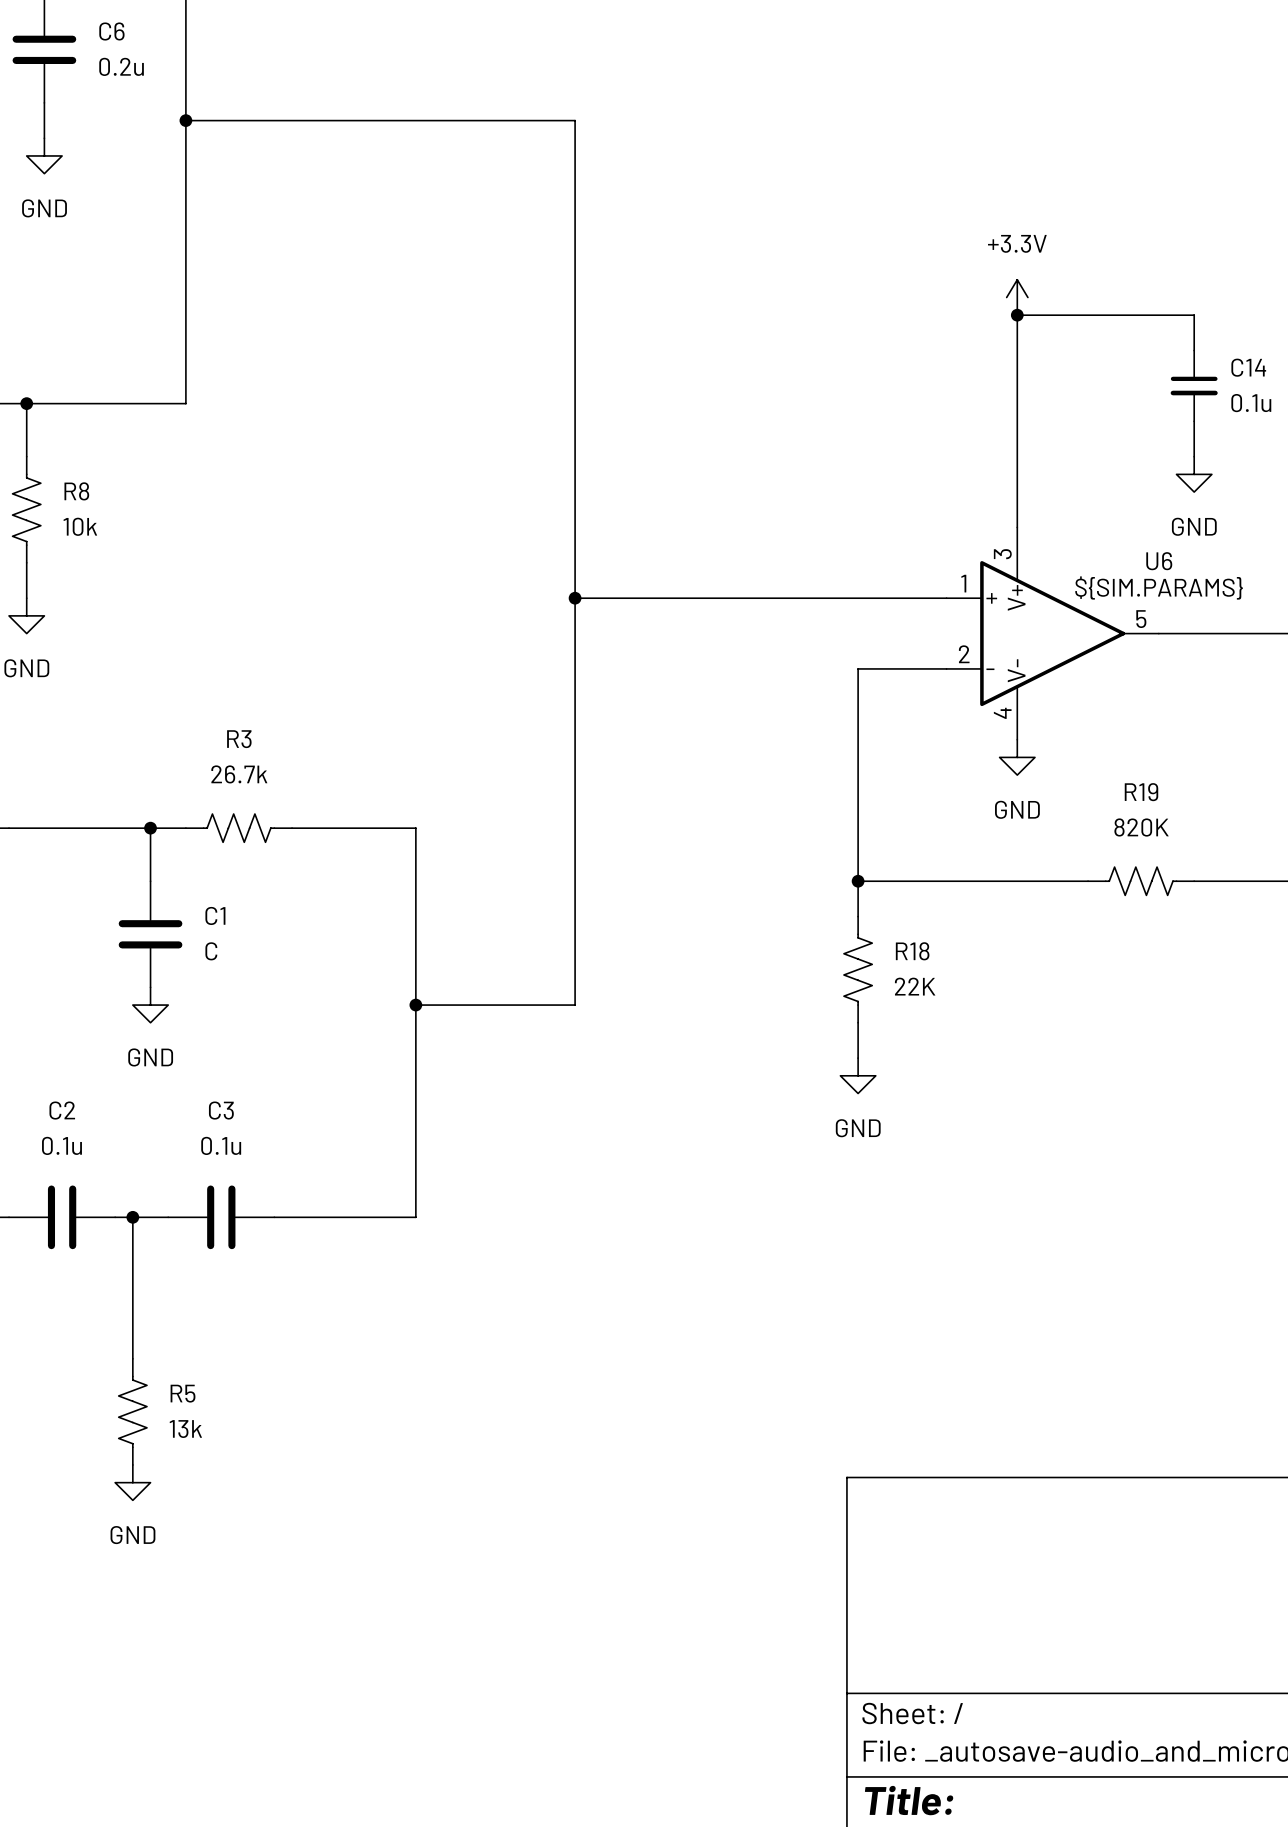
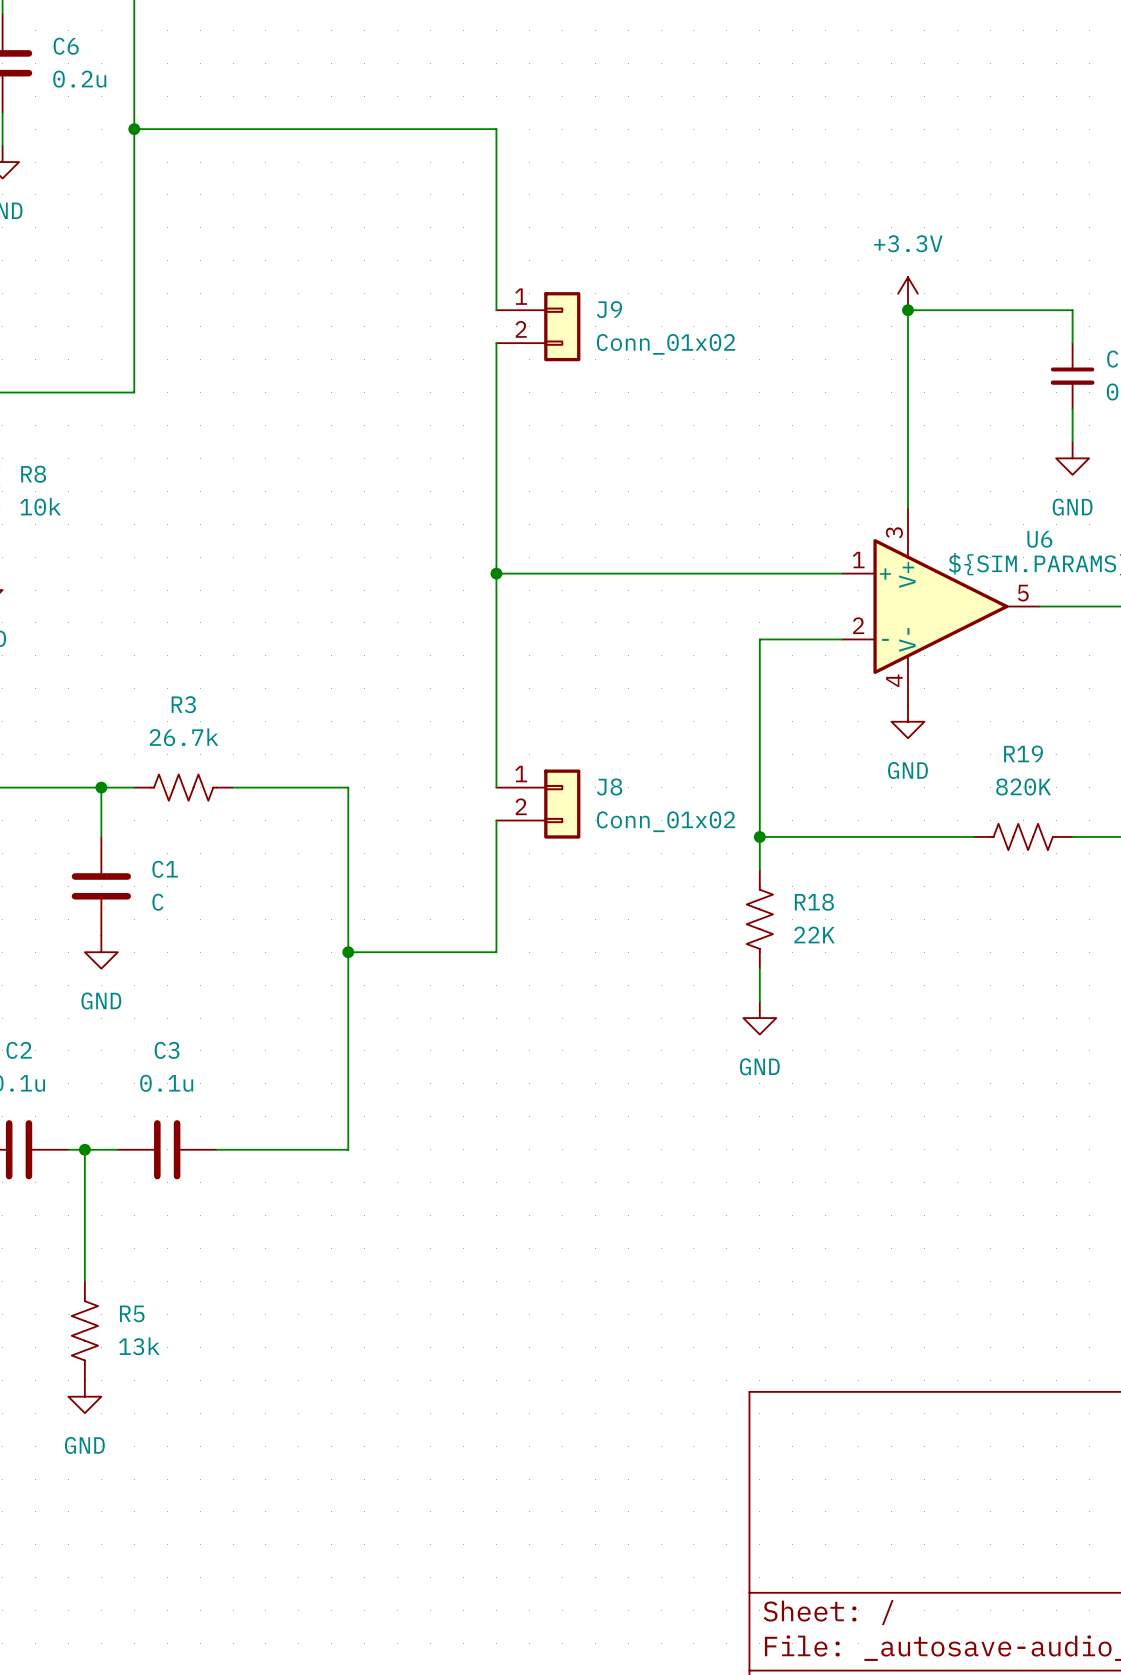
wire: (575, 315) (575, 350) -> none
J9: none -> Conn_01x02 (538, 326)
wire: (575, 828) (575, 863) -> none
J8: none -> Conn_01x02 (538, 804)

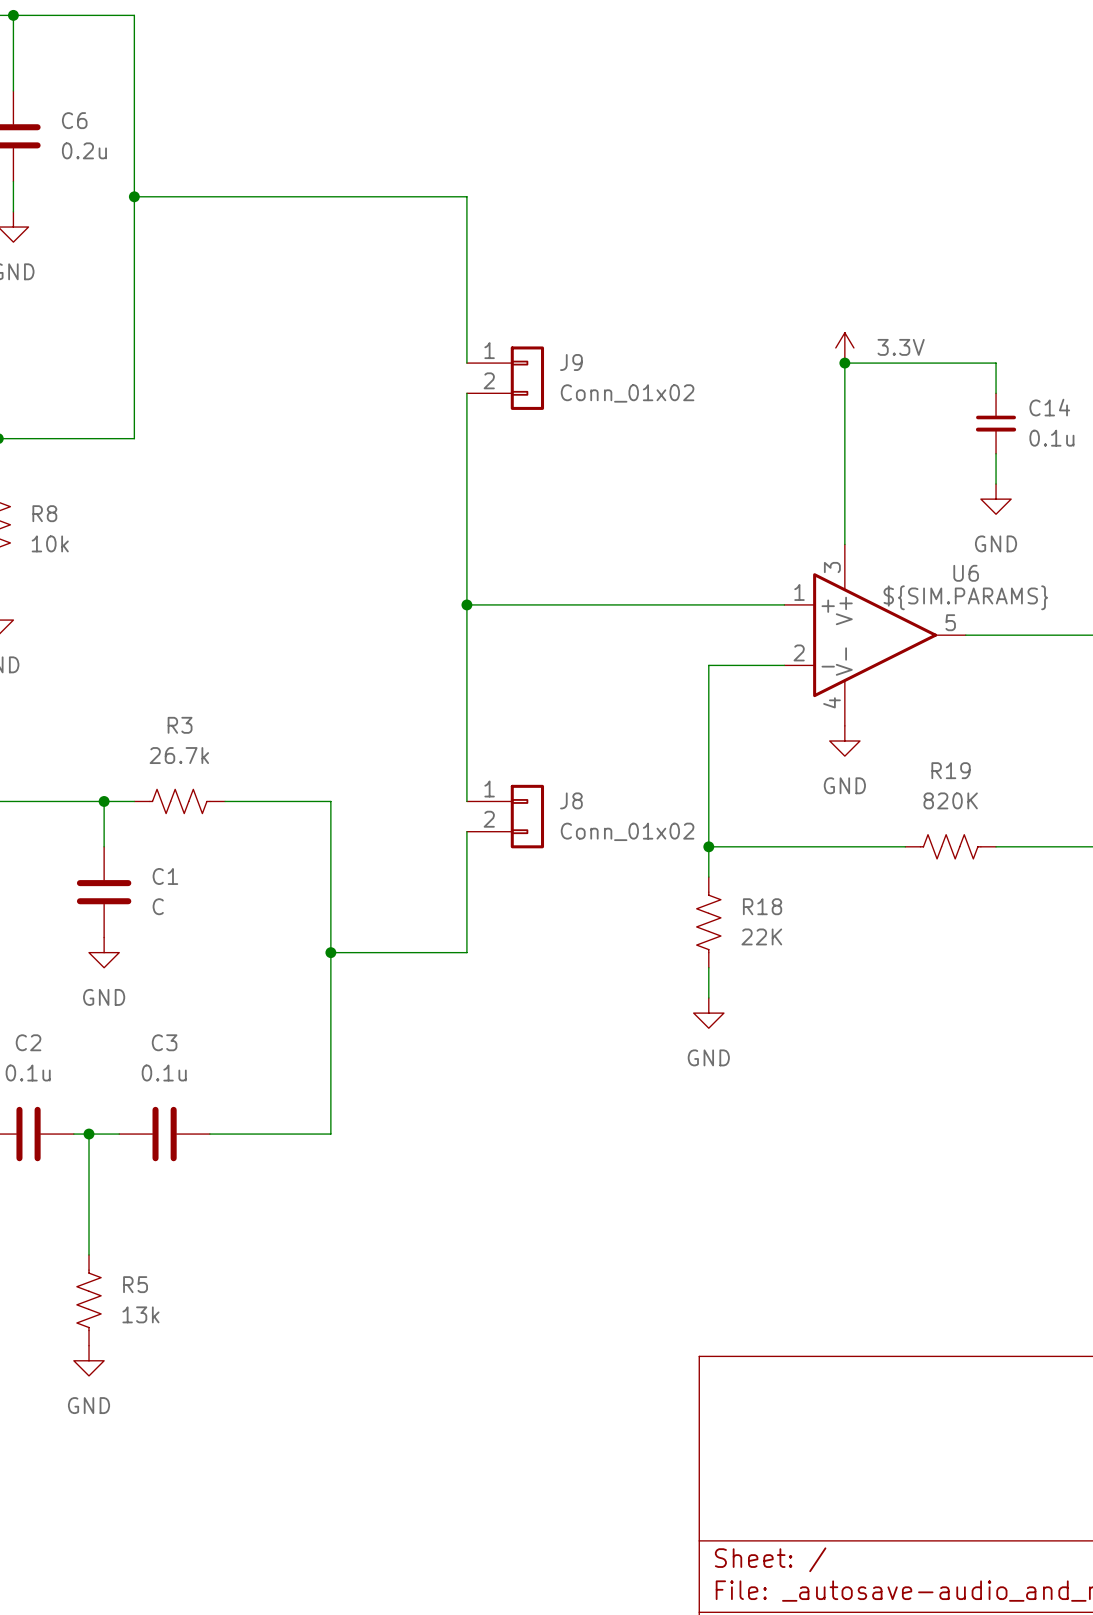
power symbol: +3.3V (907, 293) -> 3.3V (844, 347)

